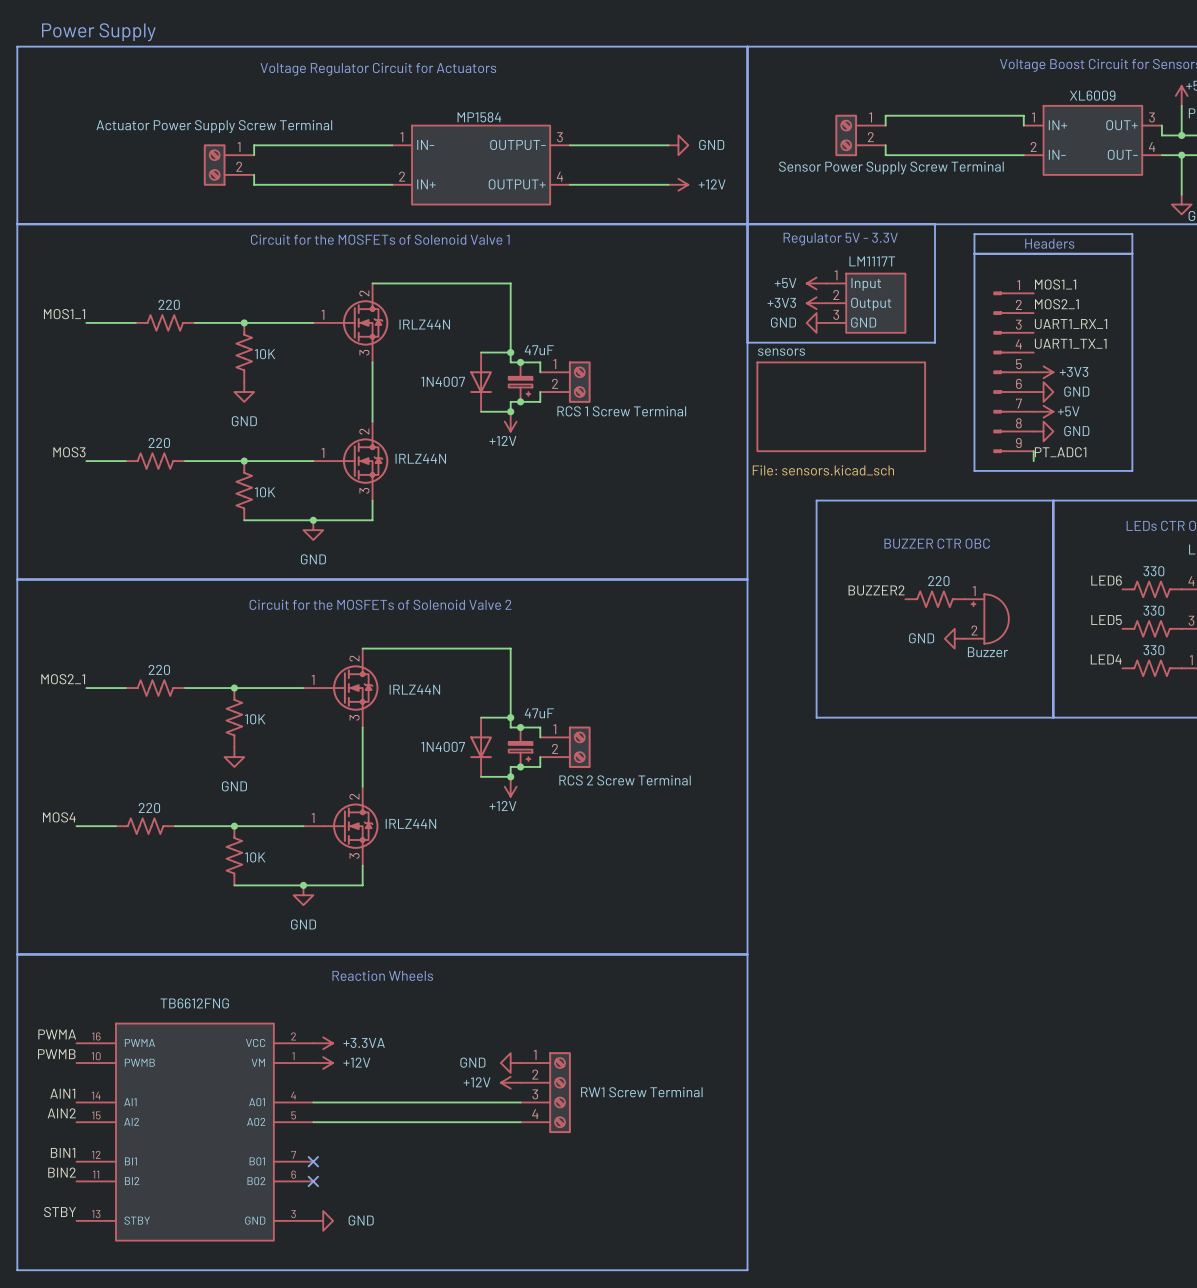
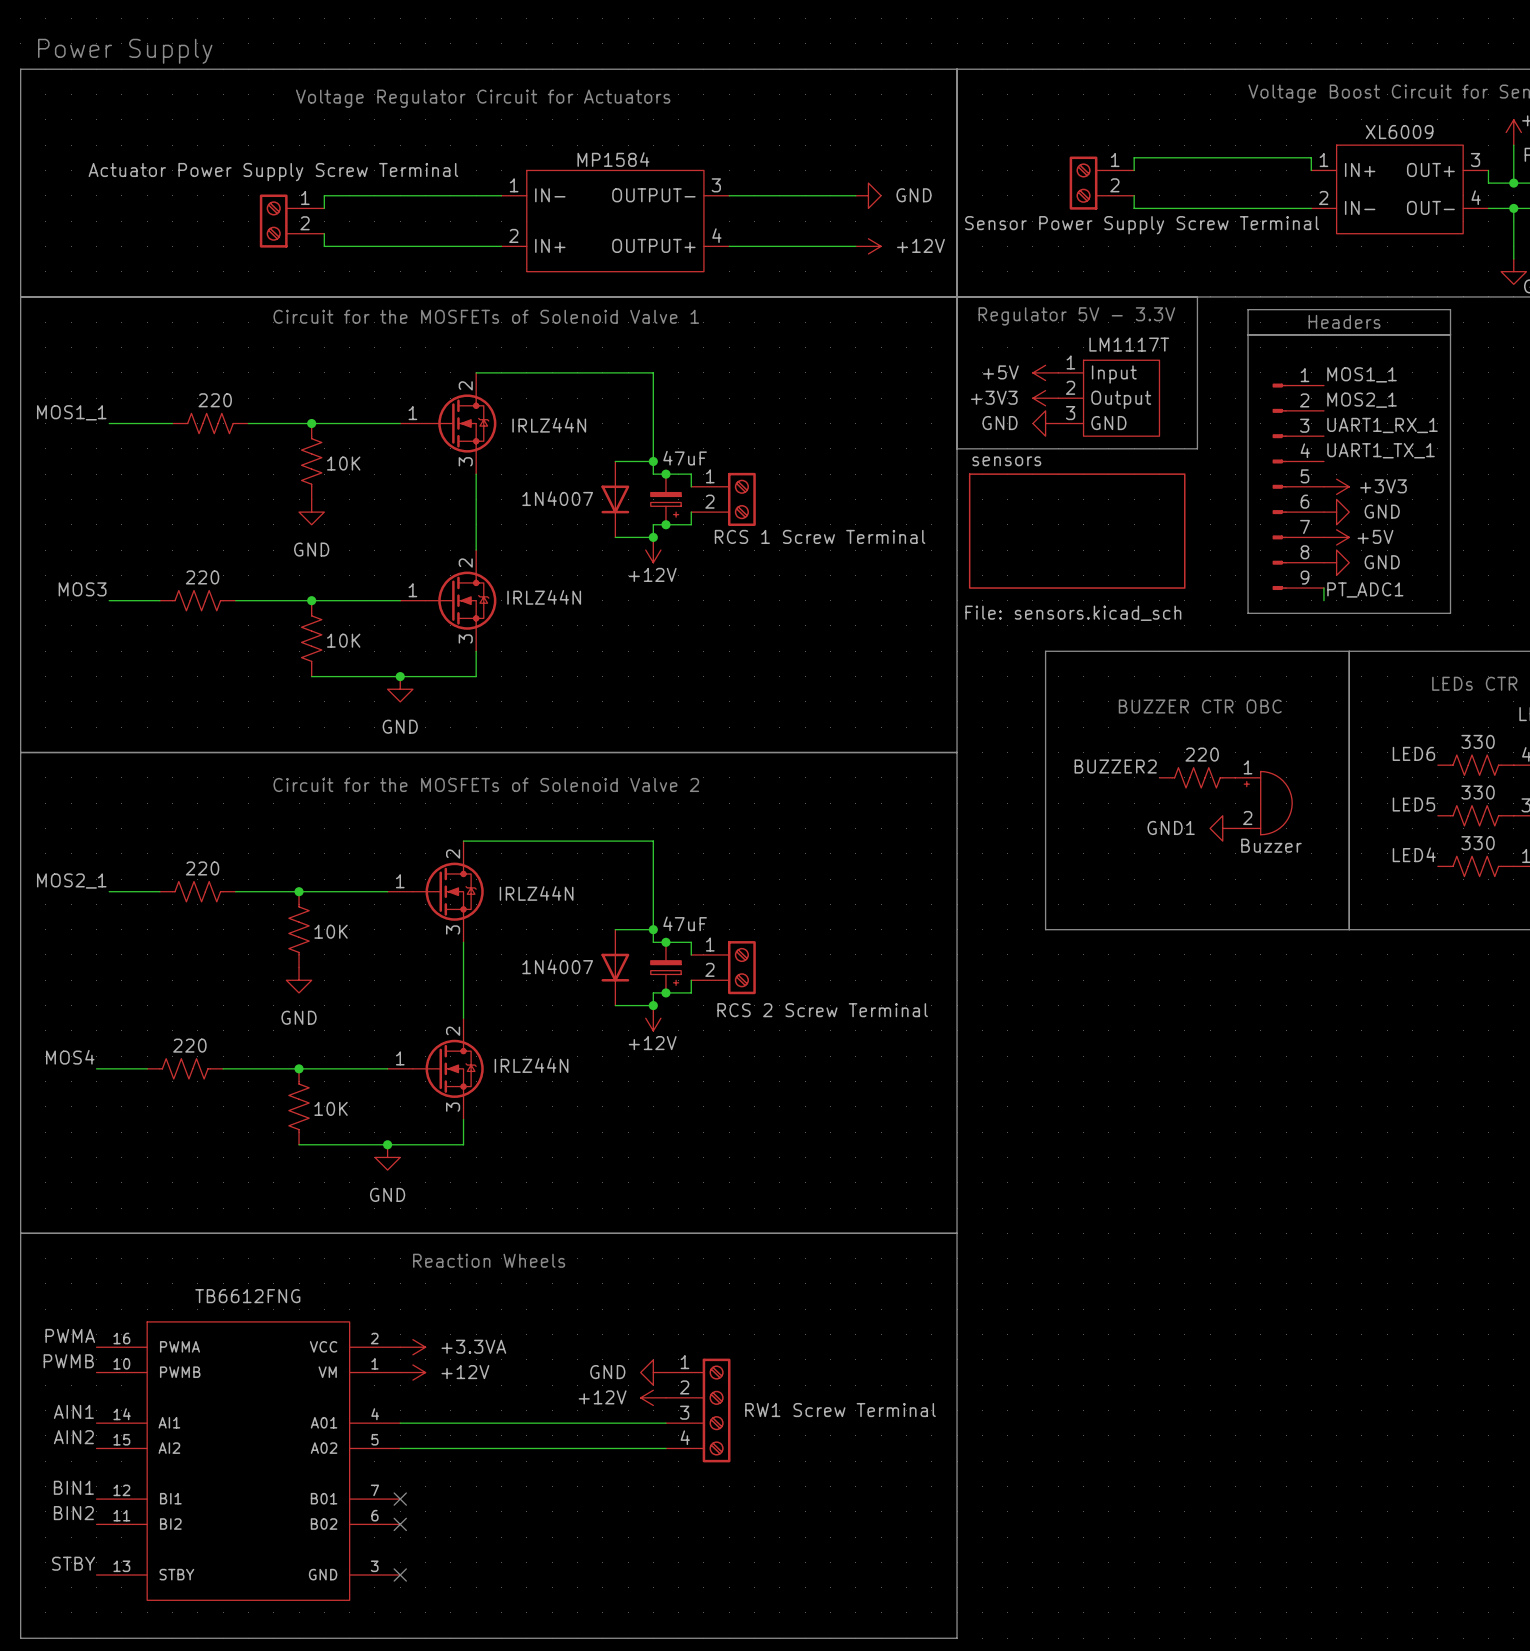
power symbol: GND (954, 638) -> GND1 (1222, 828)
no-connect mark: none -> (400, 1575)
power symbol: GND (323, 1220) -> none

